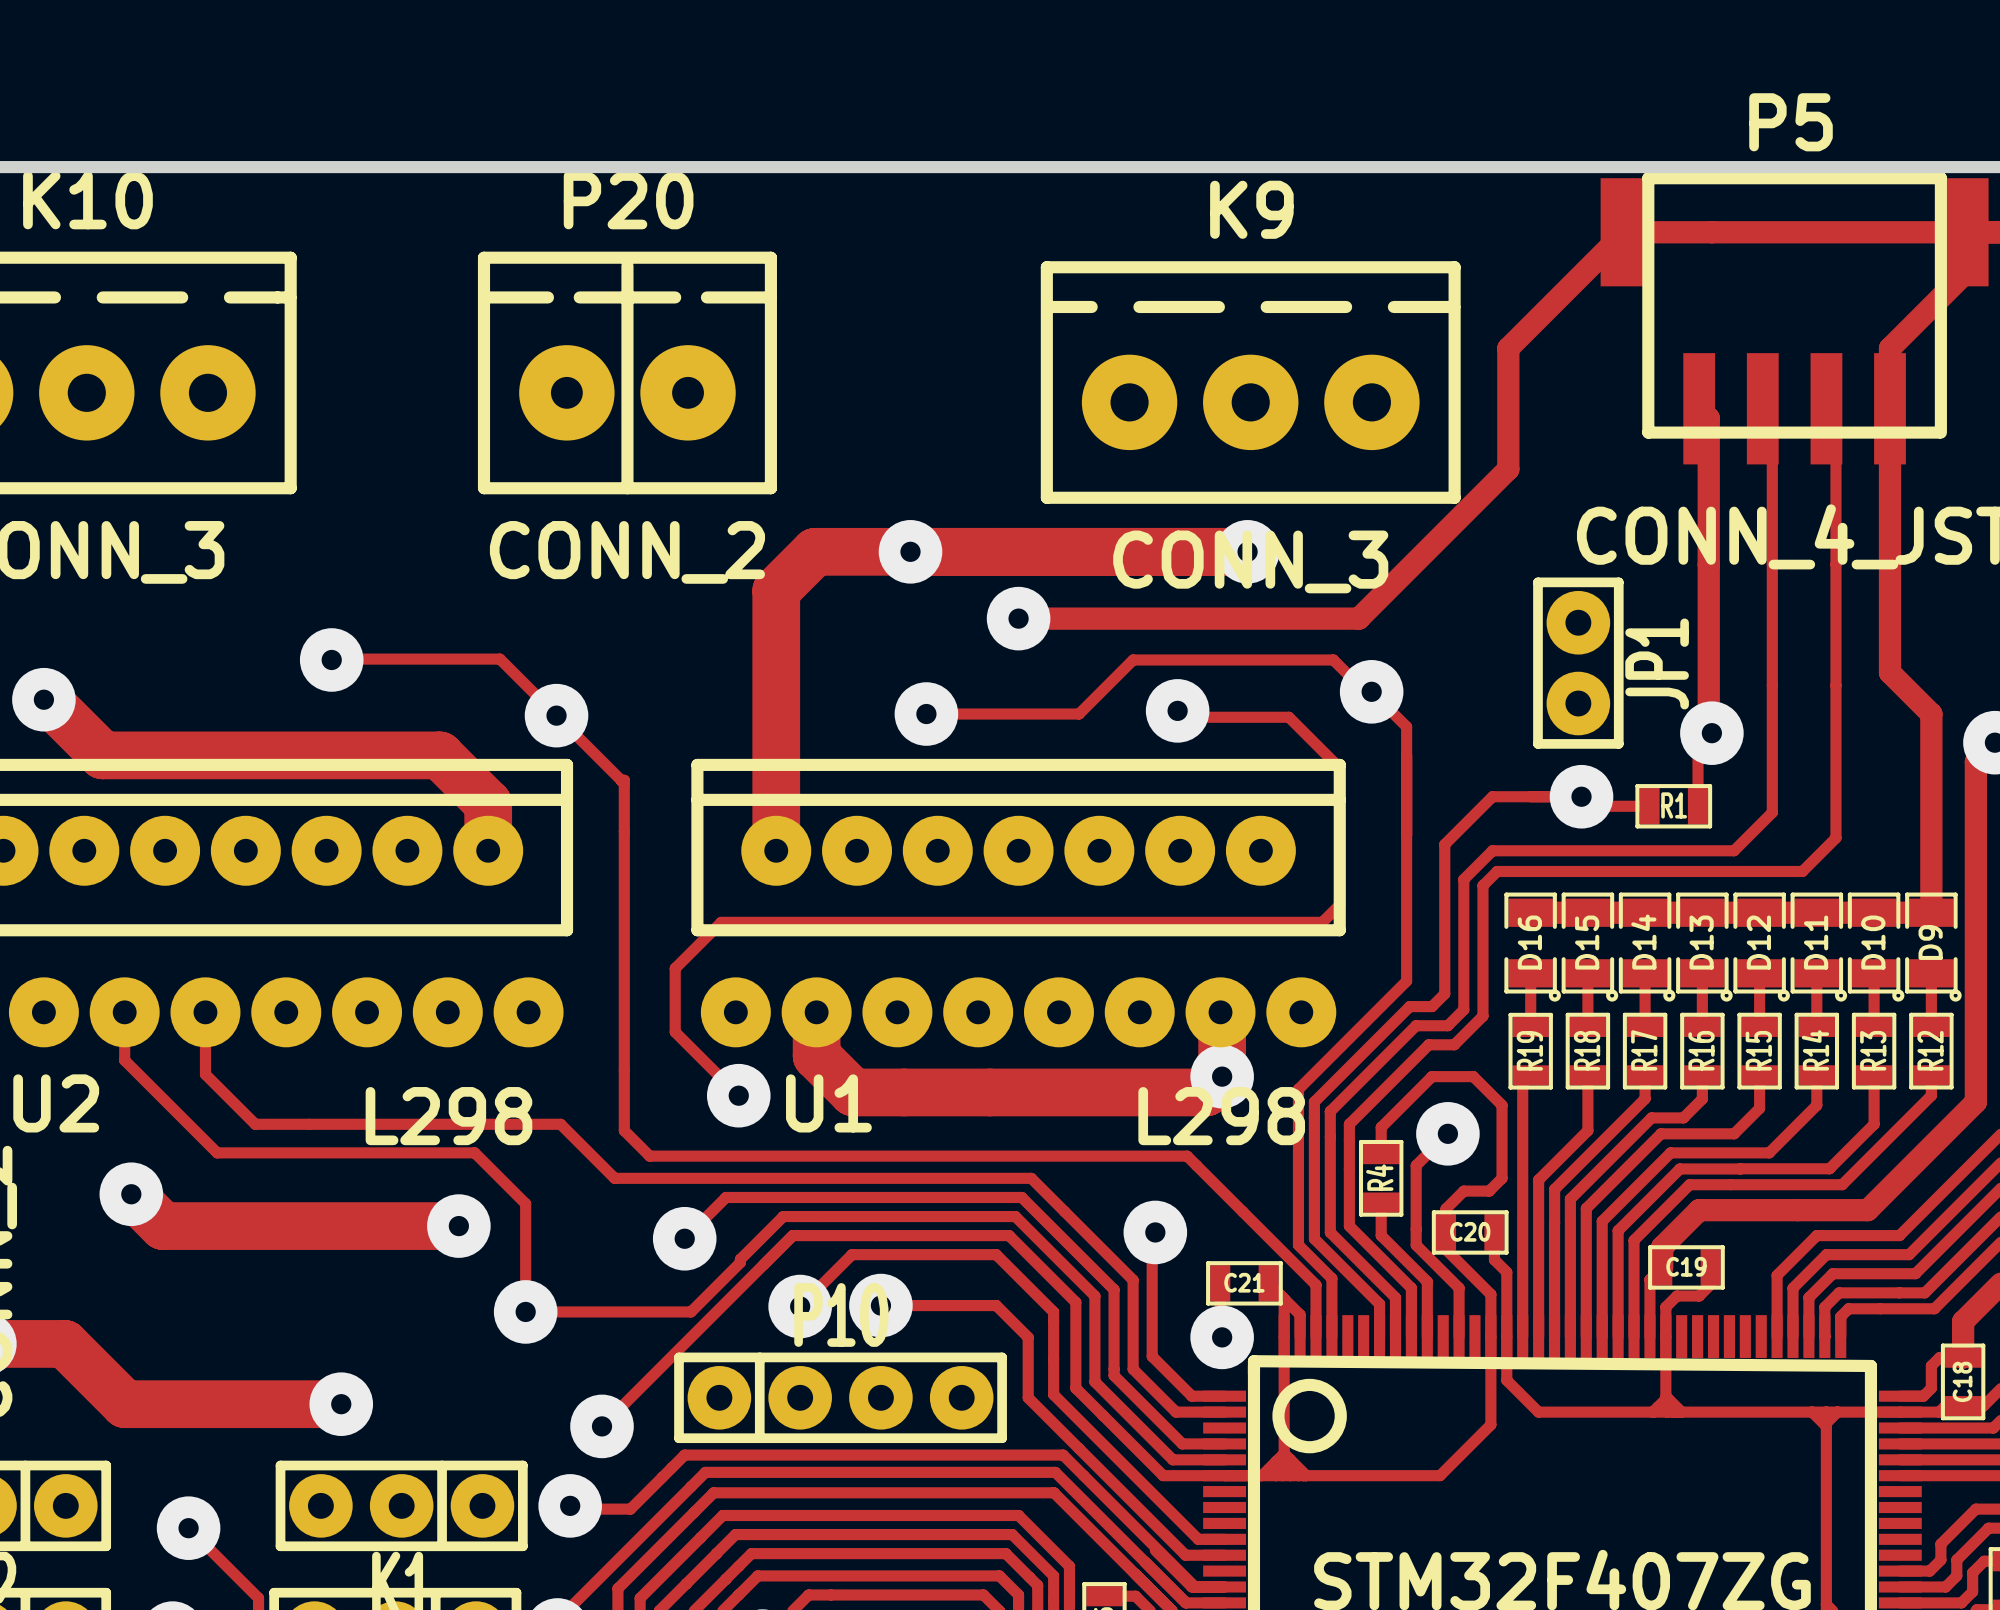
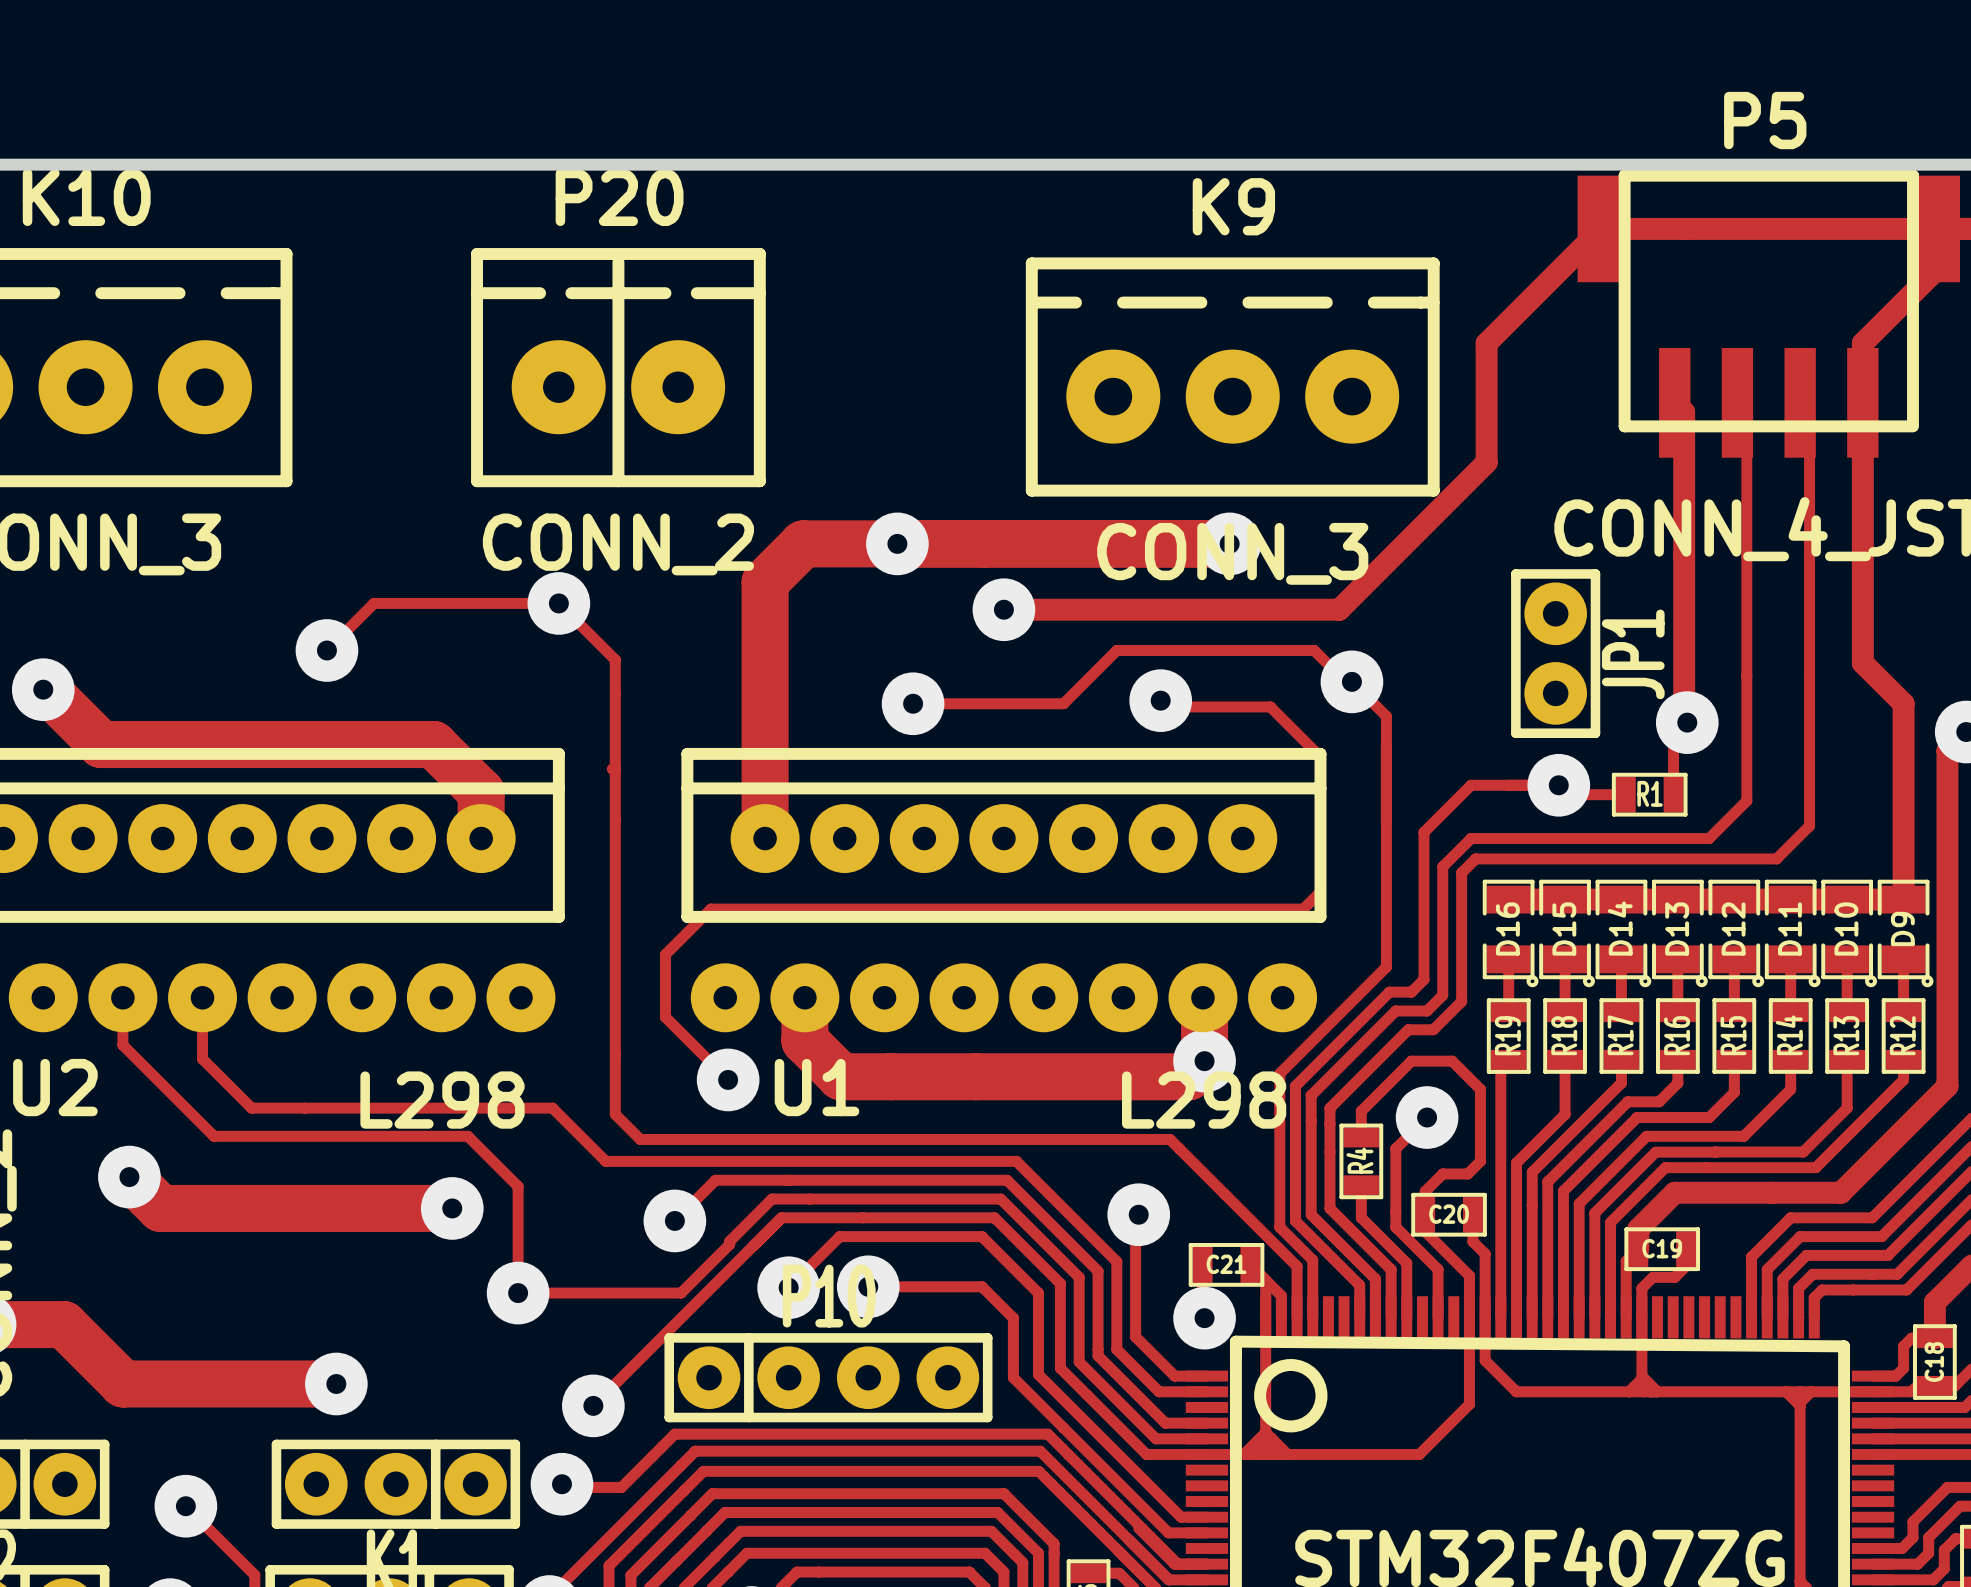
track: (332, 659) (499, 659) (624, 783) -> (327, 649) (374, 603) (558, 603) (615, 659) (615, 769)
via position: (556, 715) -> (558, 603)

